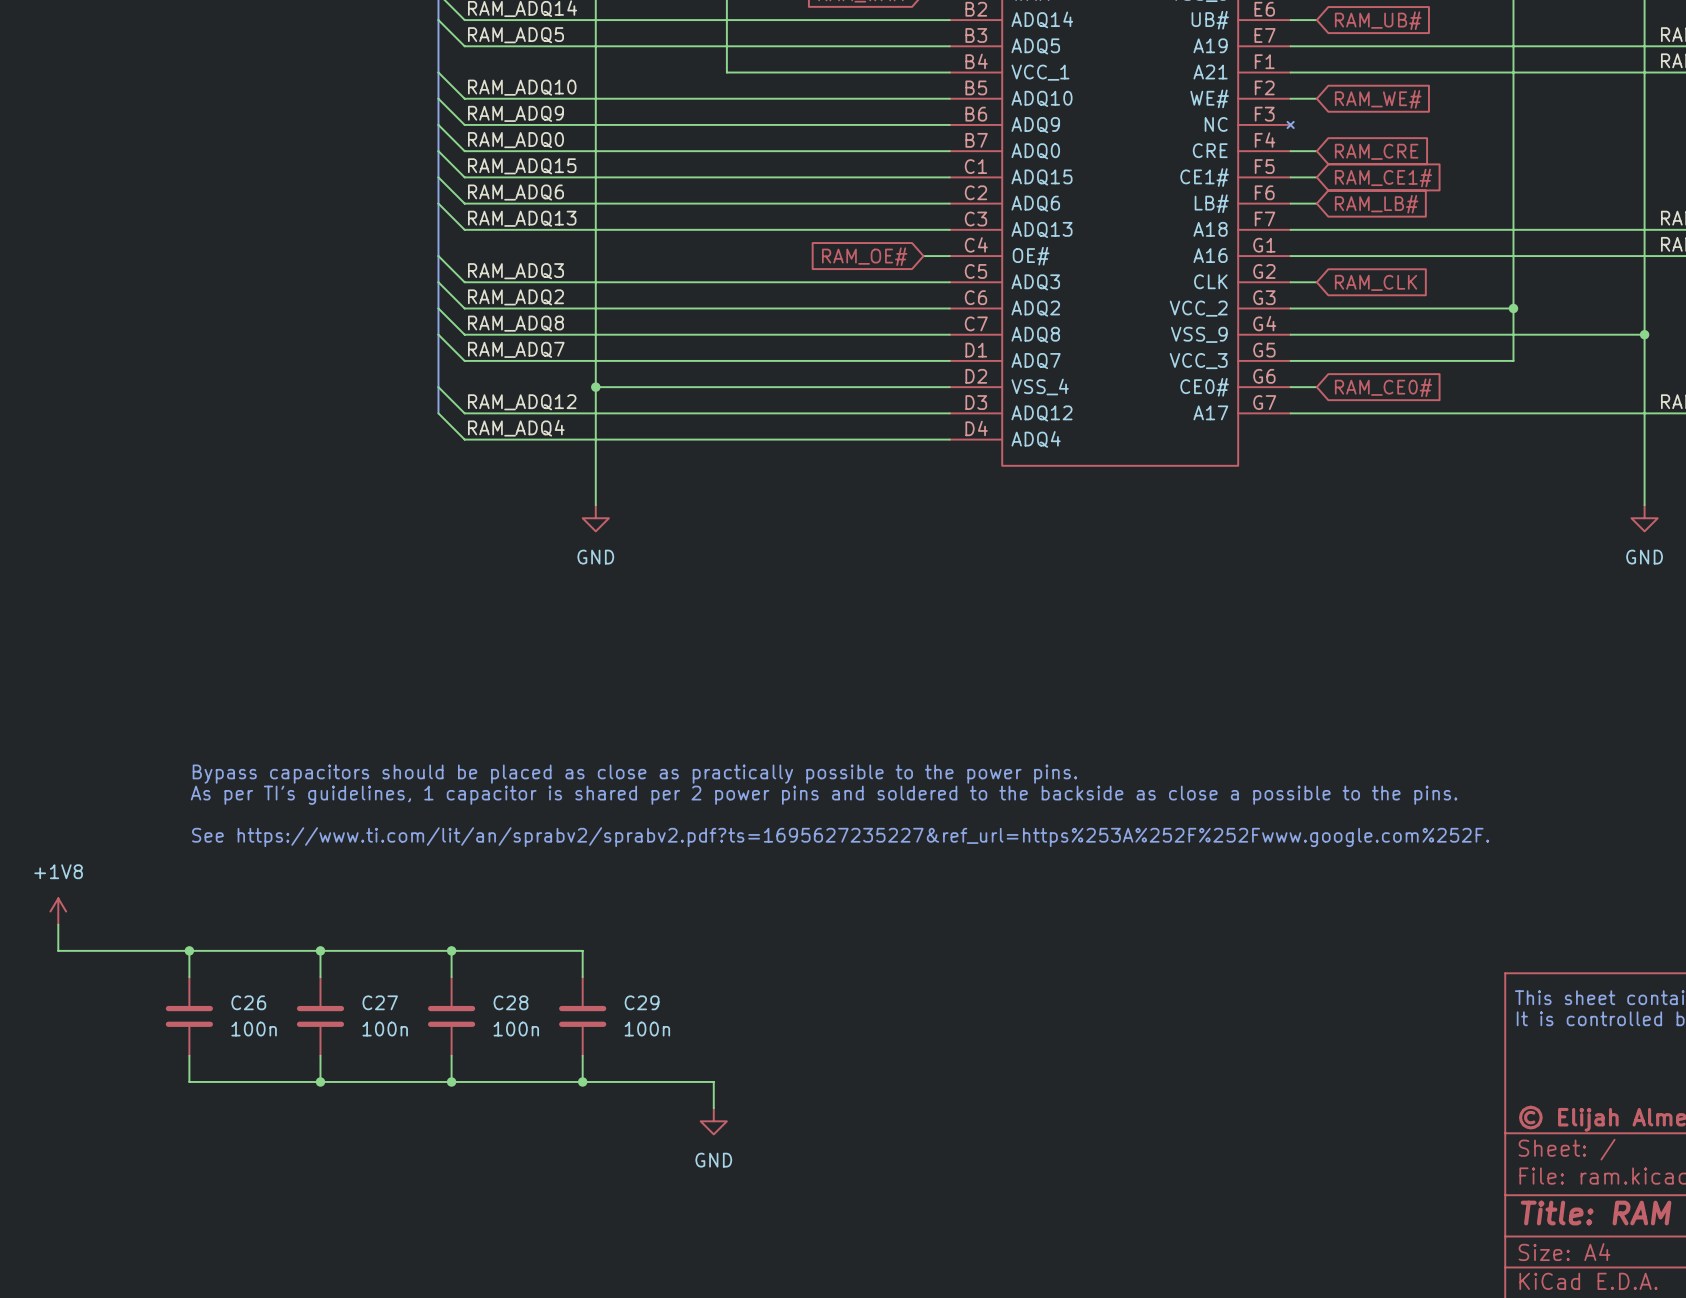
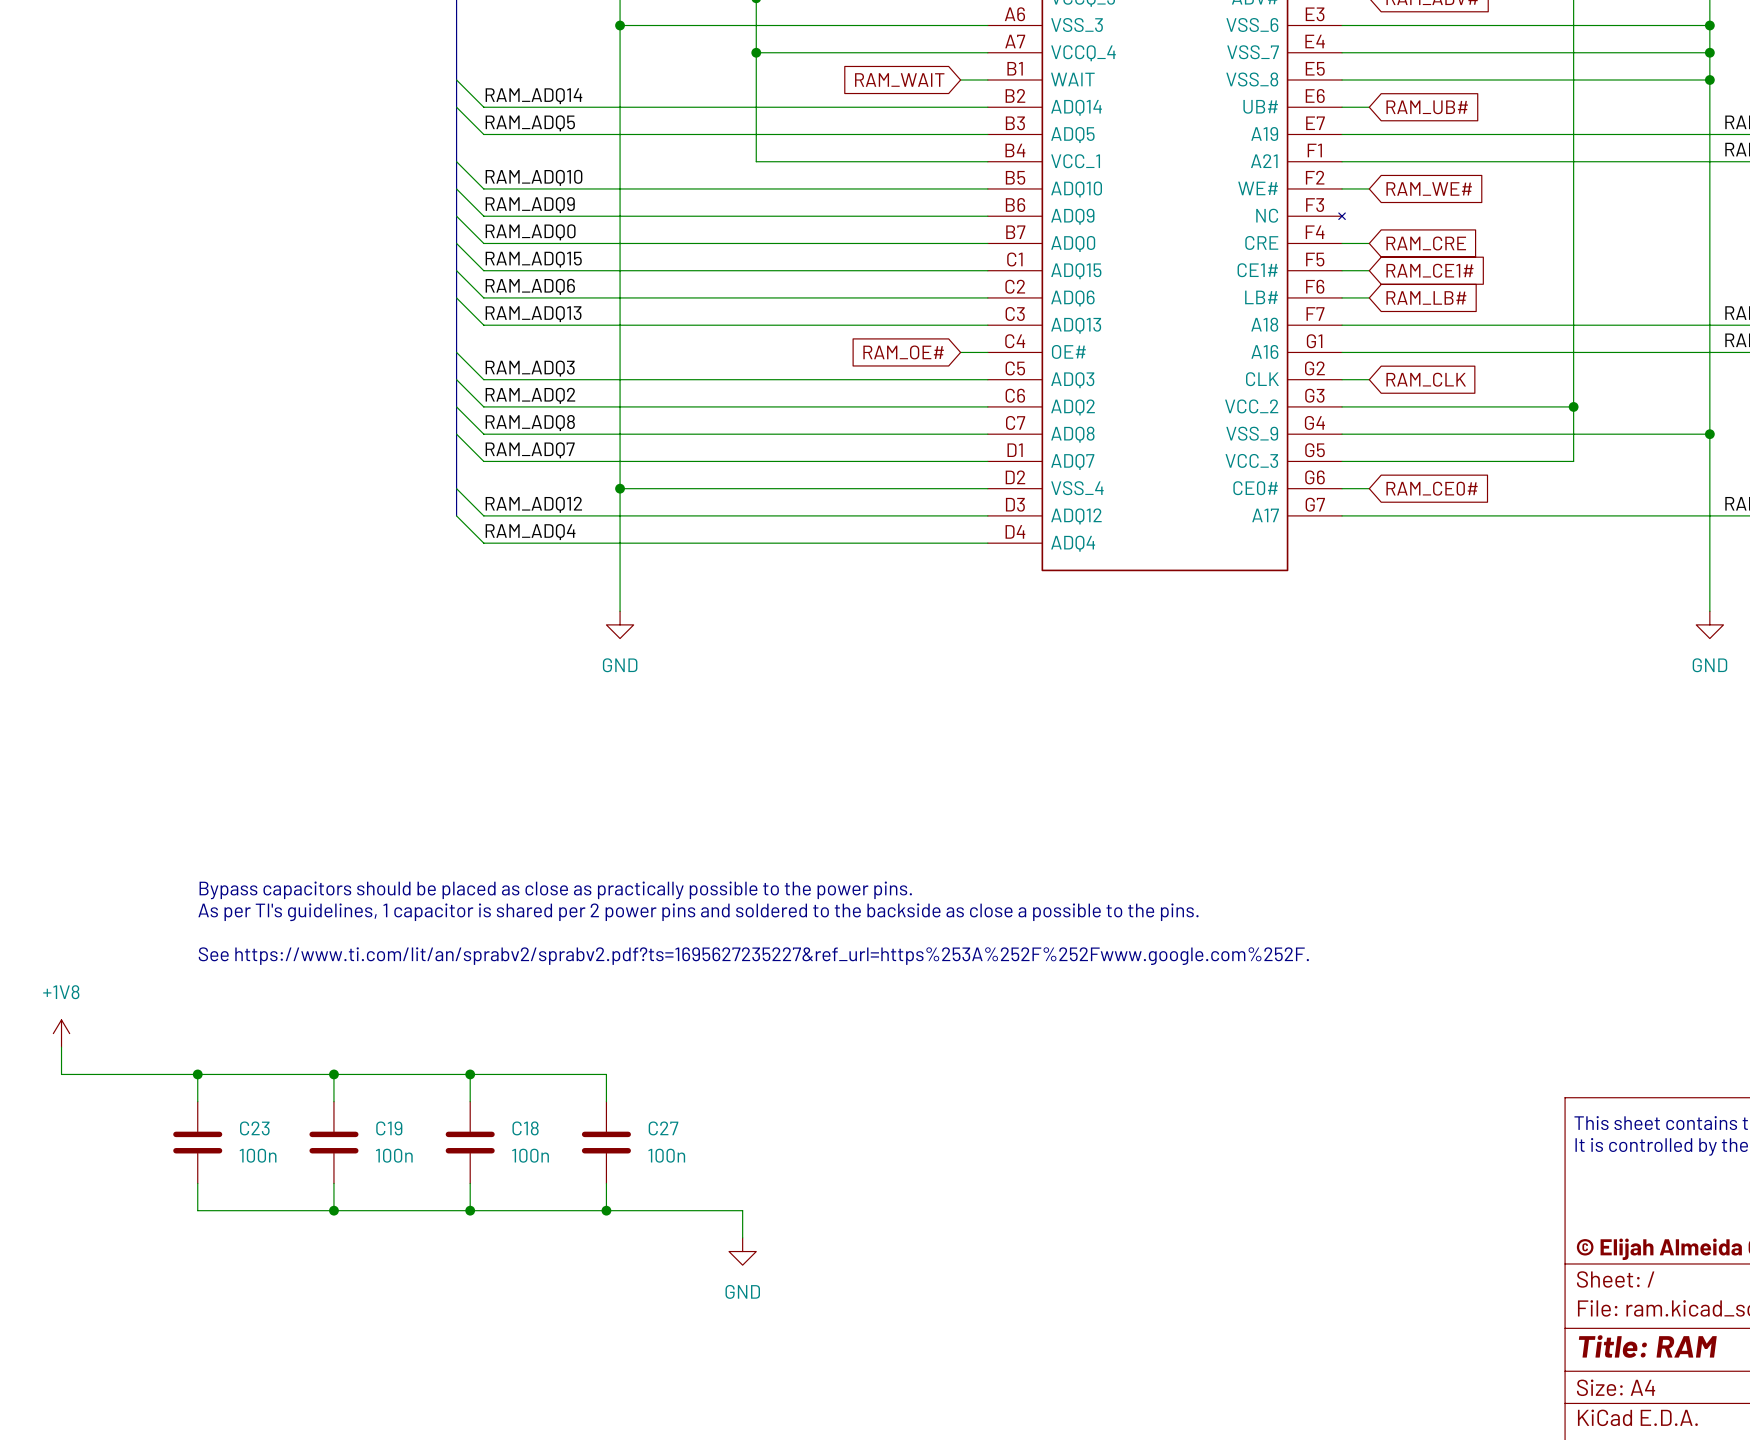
C26 name: C26 (248, 1002) -> C23 (254, 1128)
C27 name: C27 (380, 1002) -> C19 (389, 1128)
C28 name: C28 (510, 1002) -> C18 (525, 1128)
C29 name: C29 (642, 1002) -> C27 (663, 1128)

